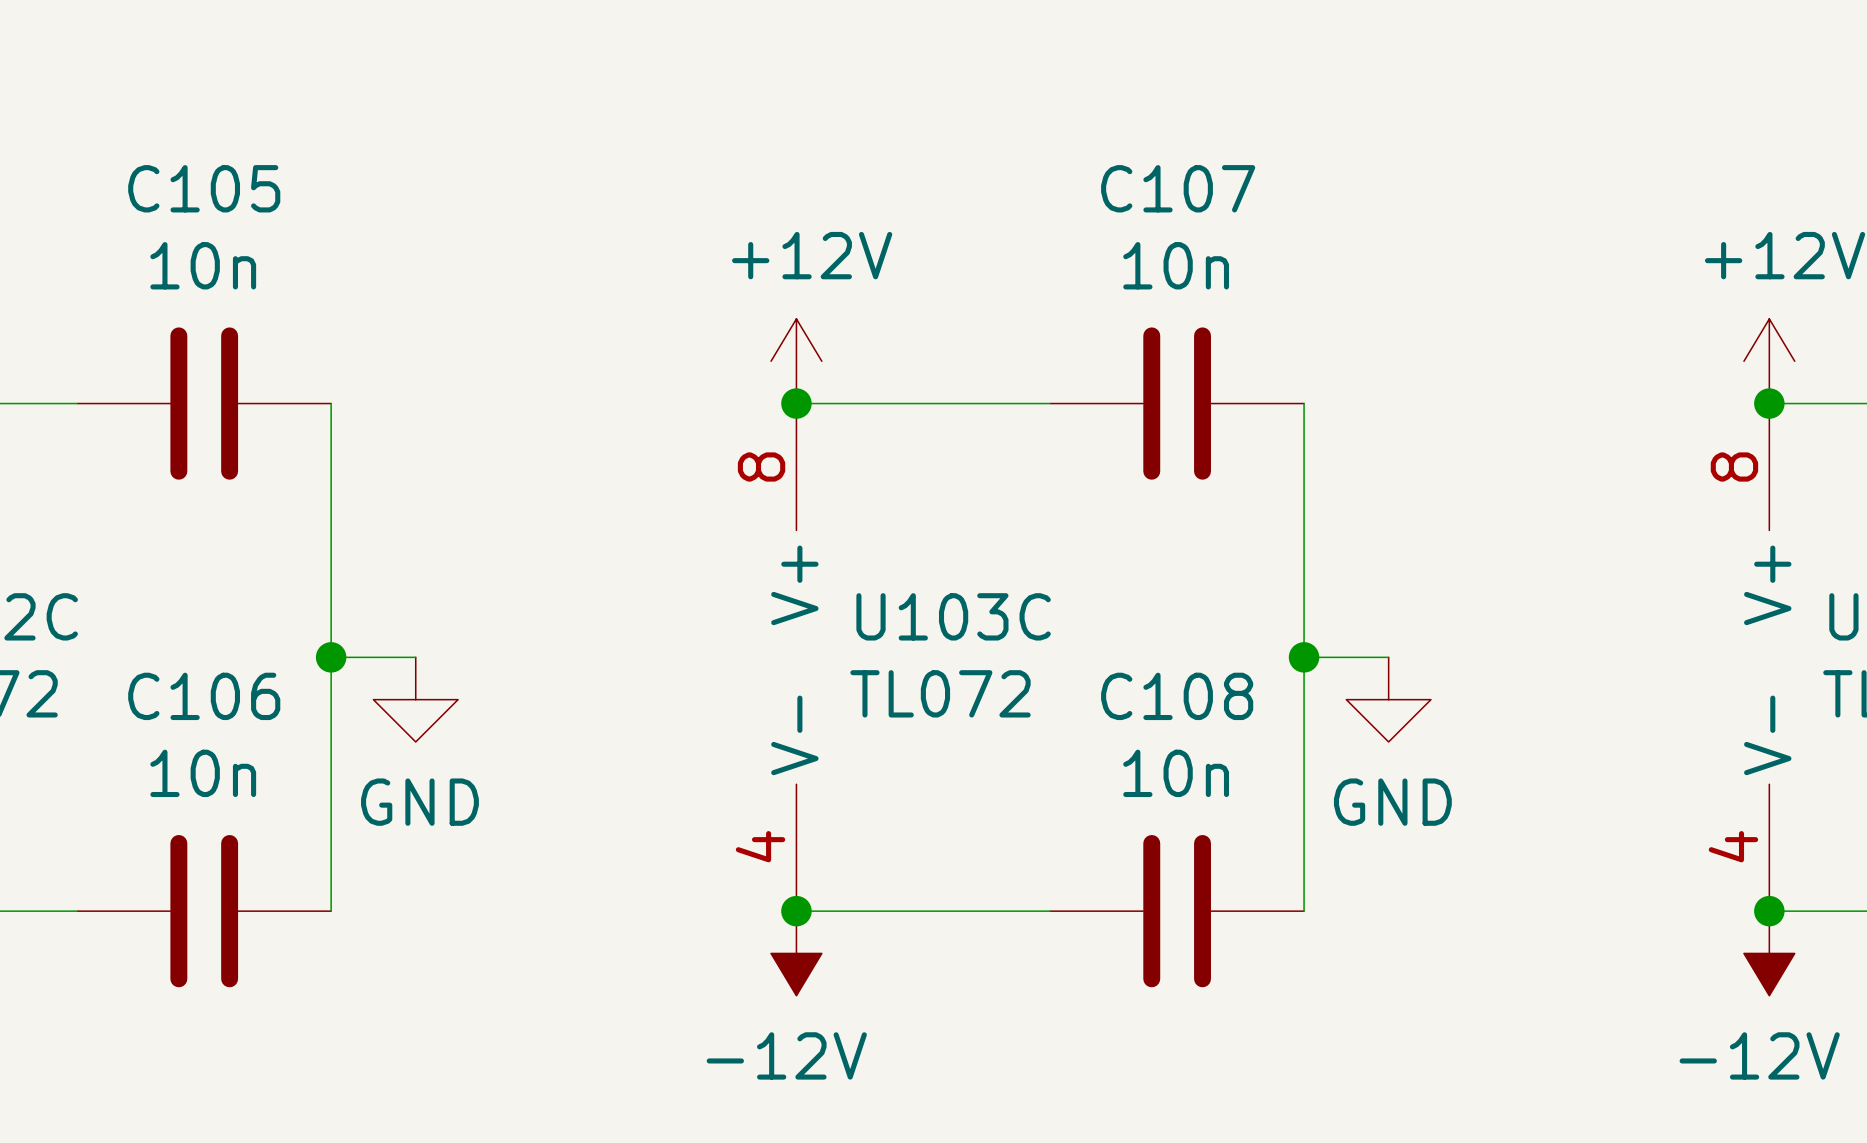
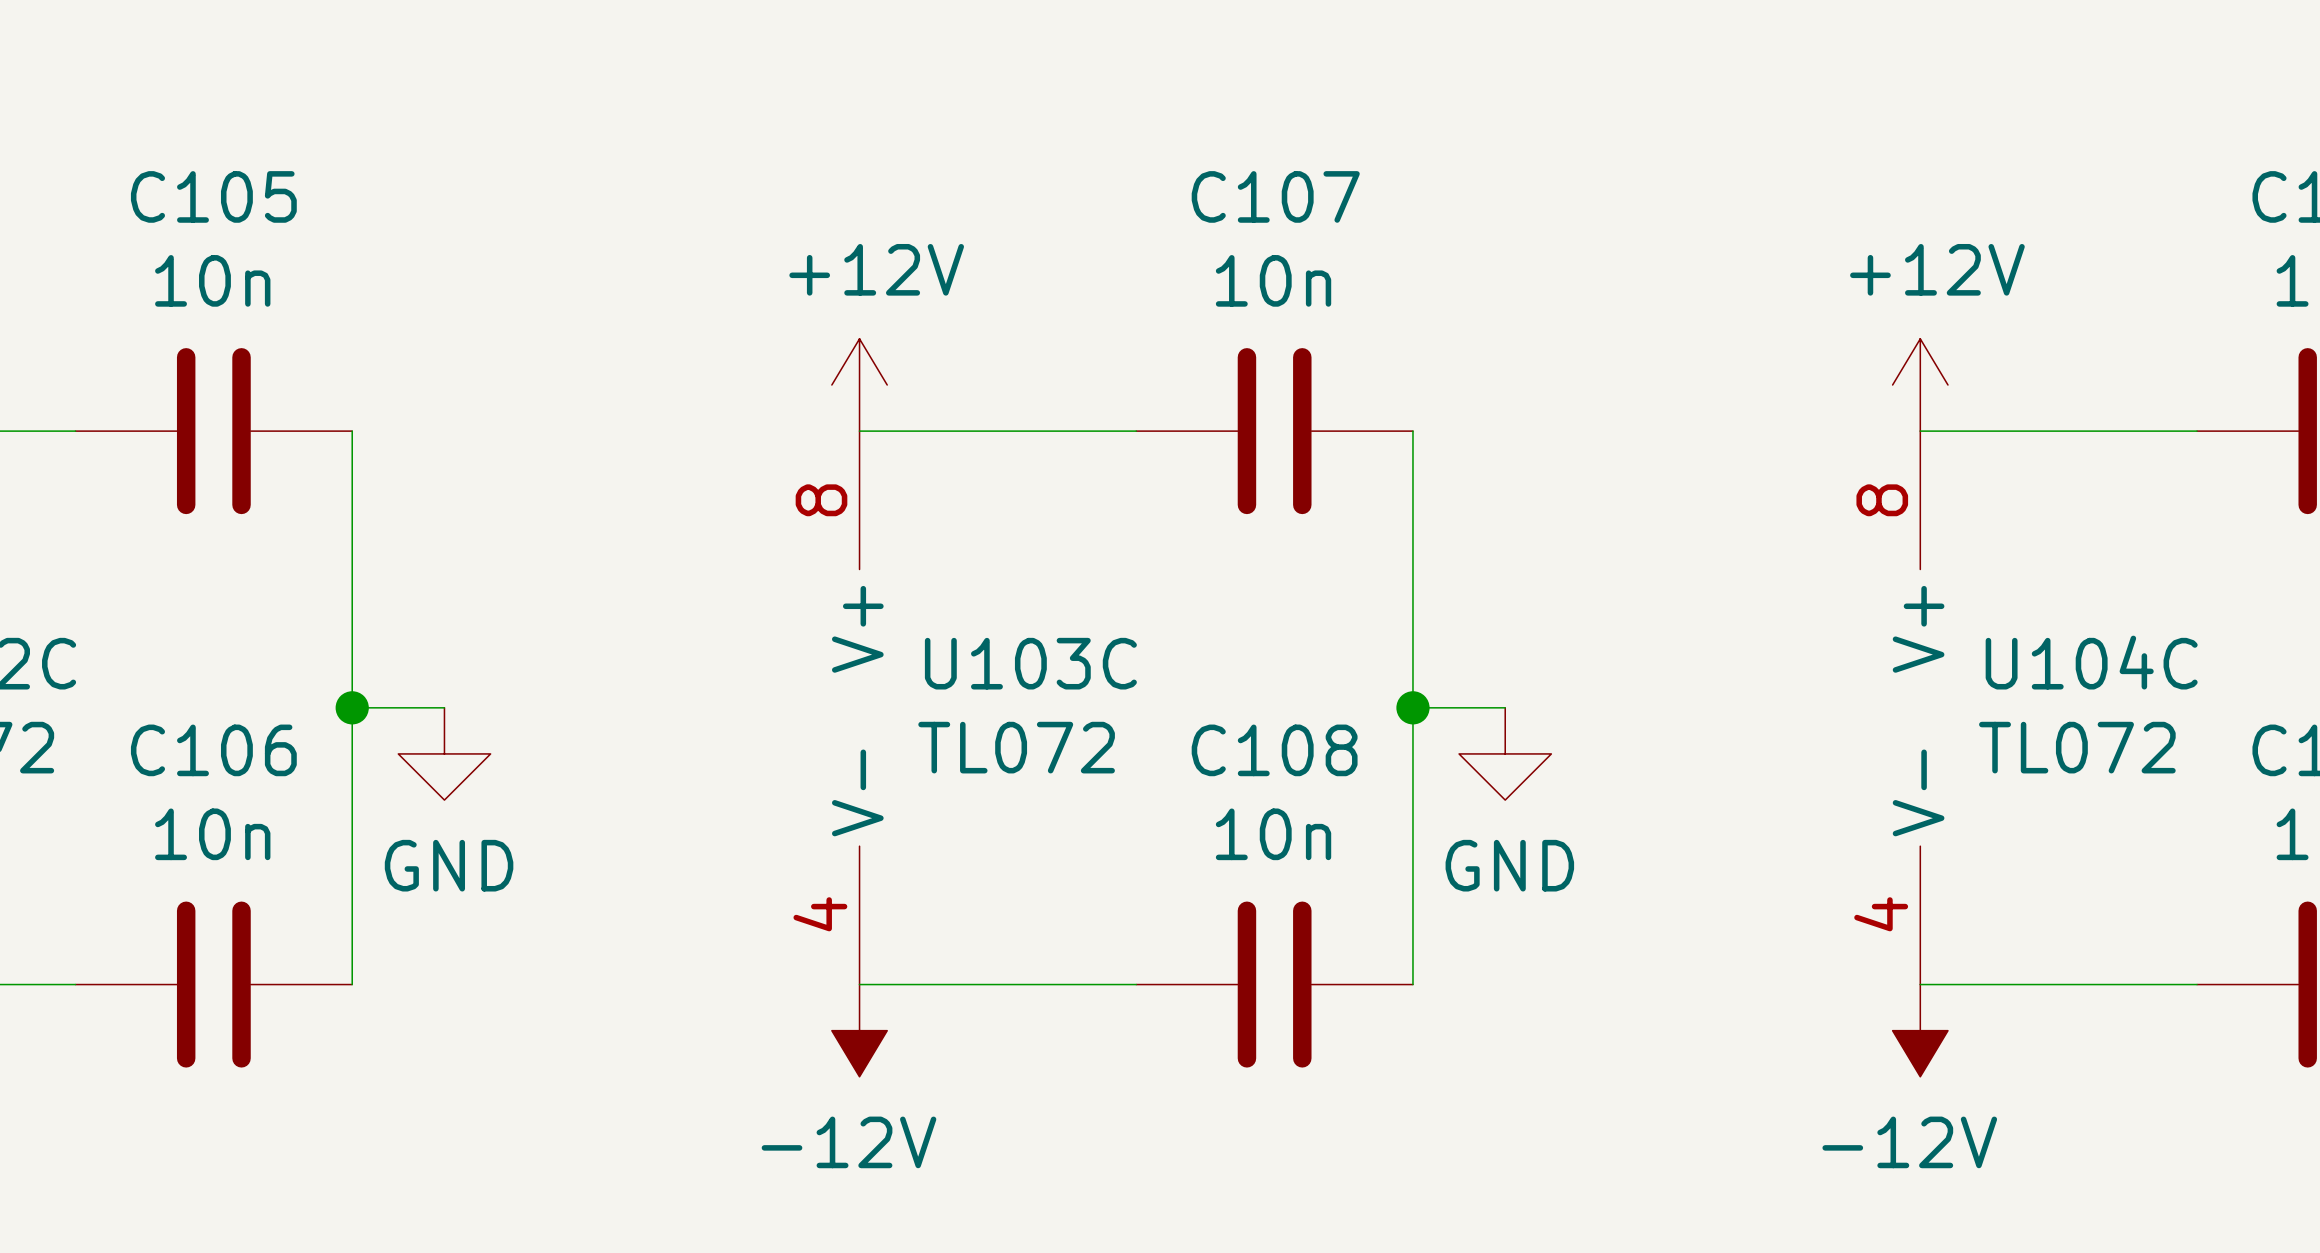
junction: (796, 403) -> none
junction: (1769, 403) -> none
junction: (796, 911) -> none
junction: (1769, 911) -> none

